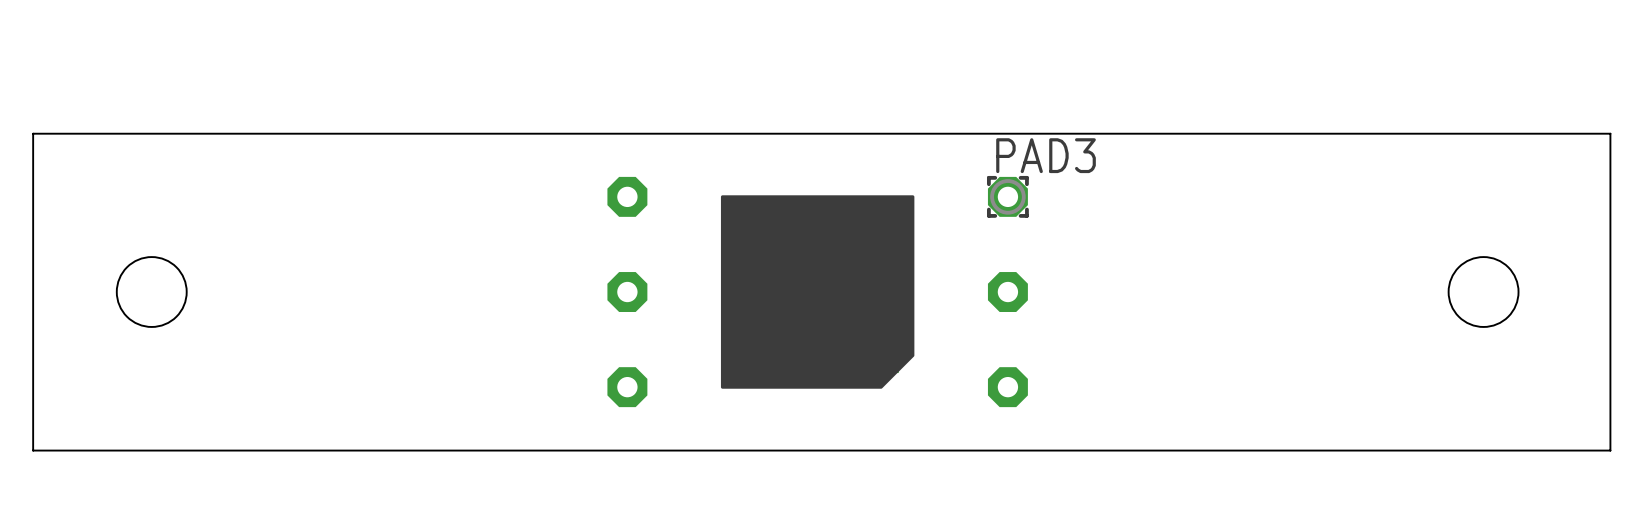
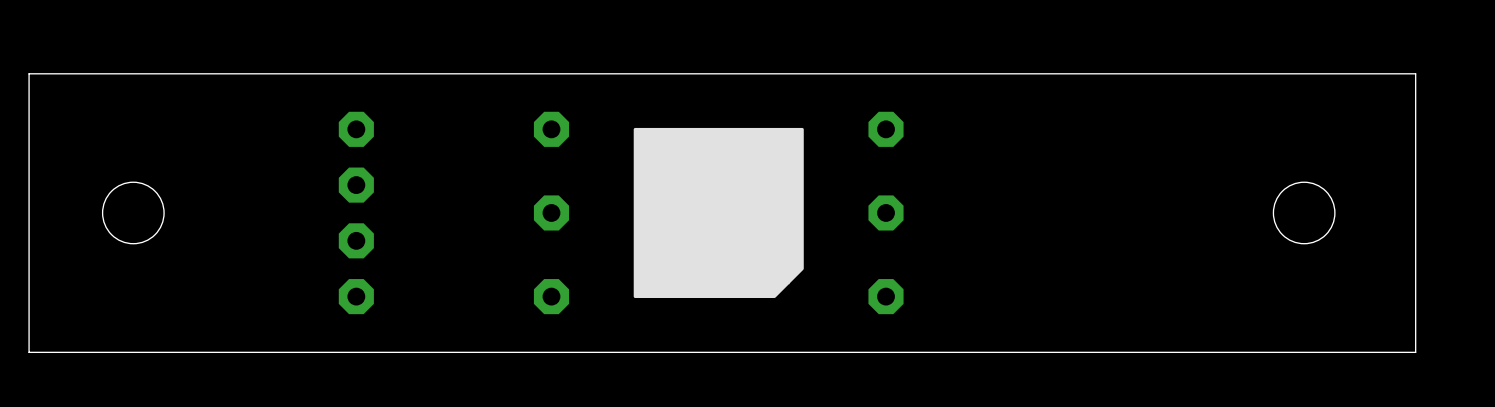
part: none -> (356, 129)
PAD3 side: bottom (1007, 196) -> top (886, 129)
part: none -> (356, 185)
part: none -> (356, 240)
part: none -> (356, 296)

